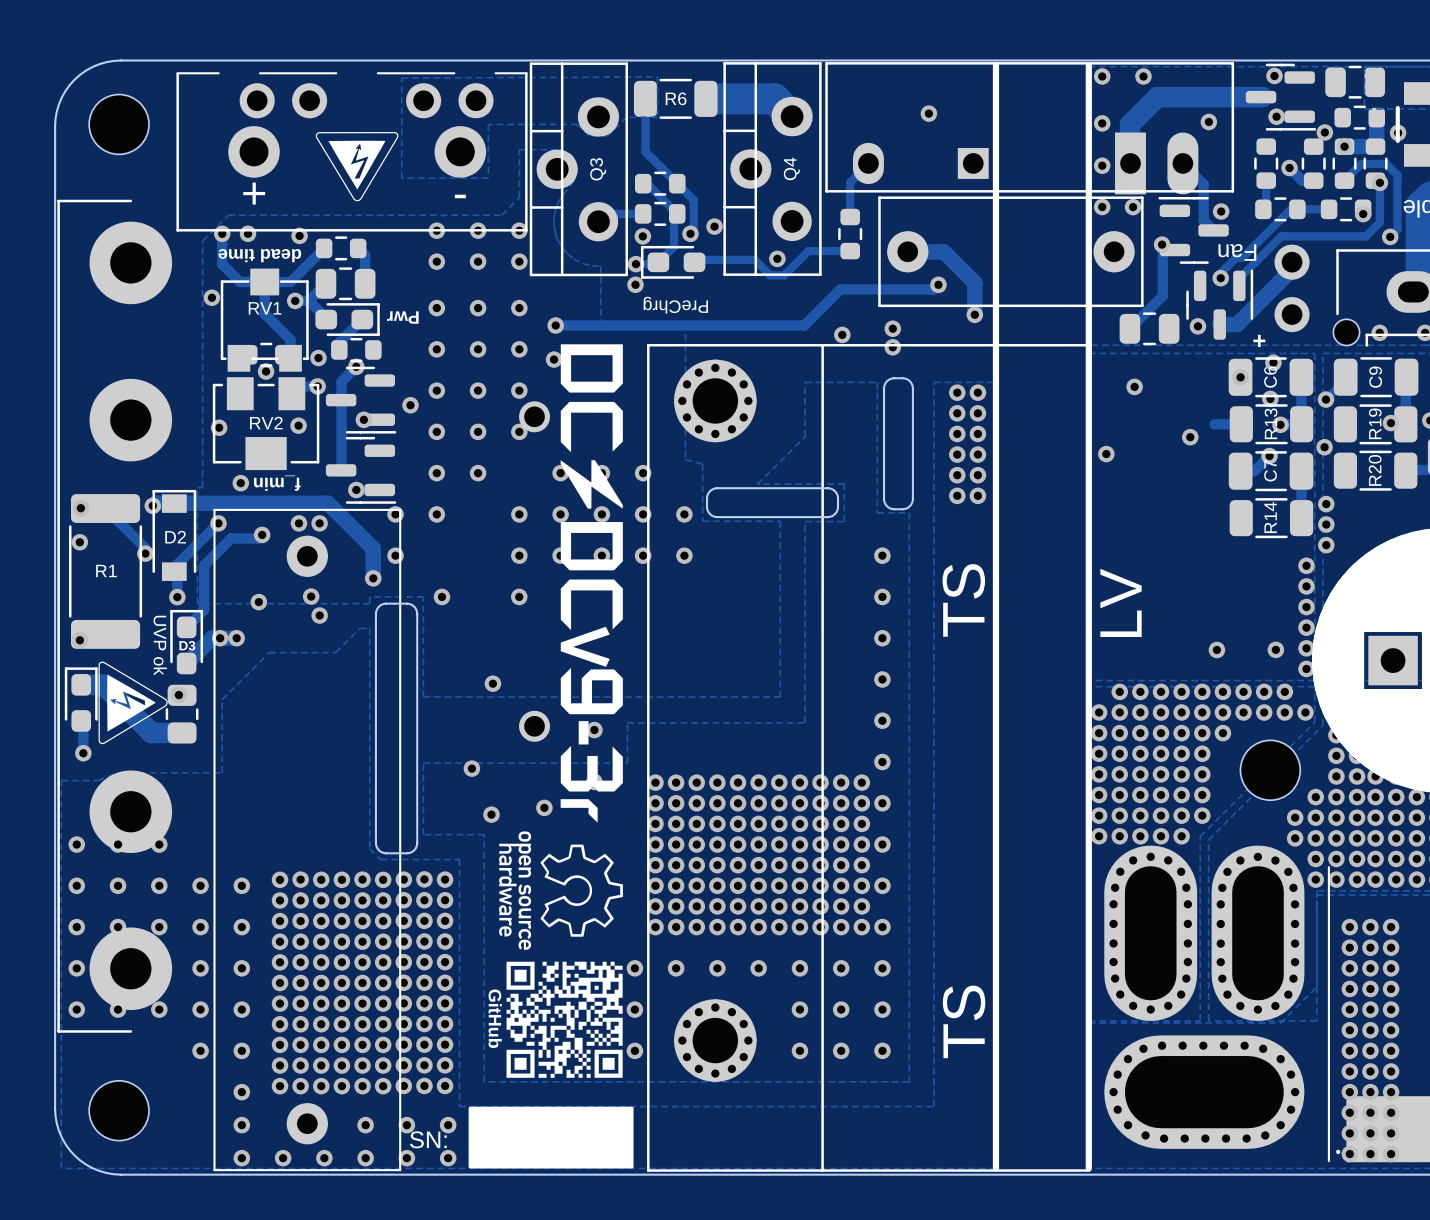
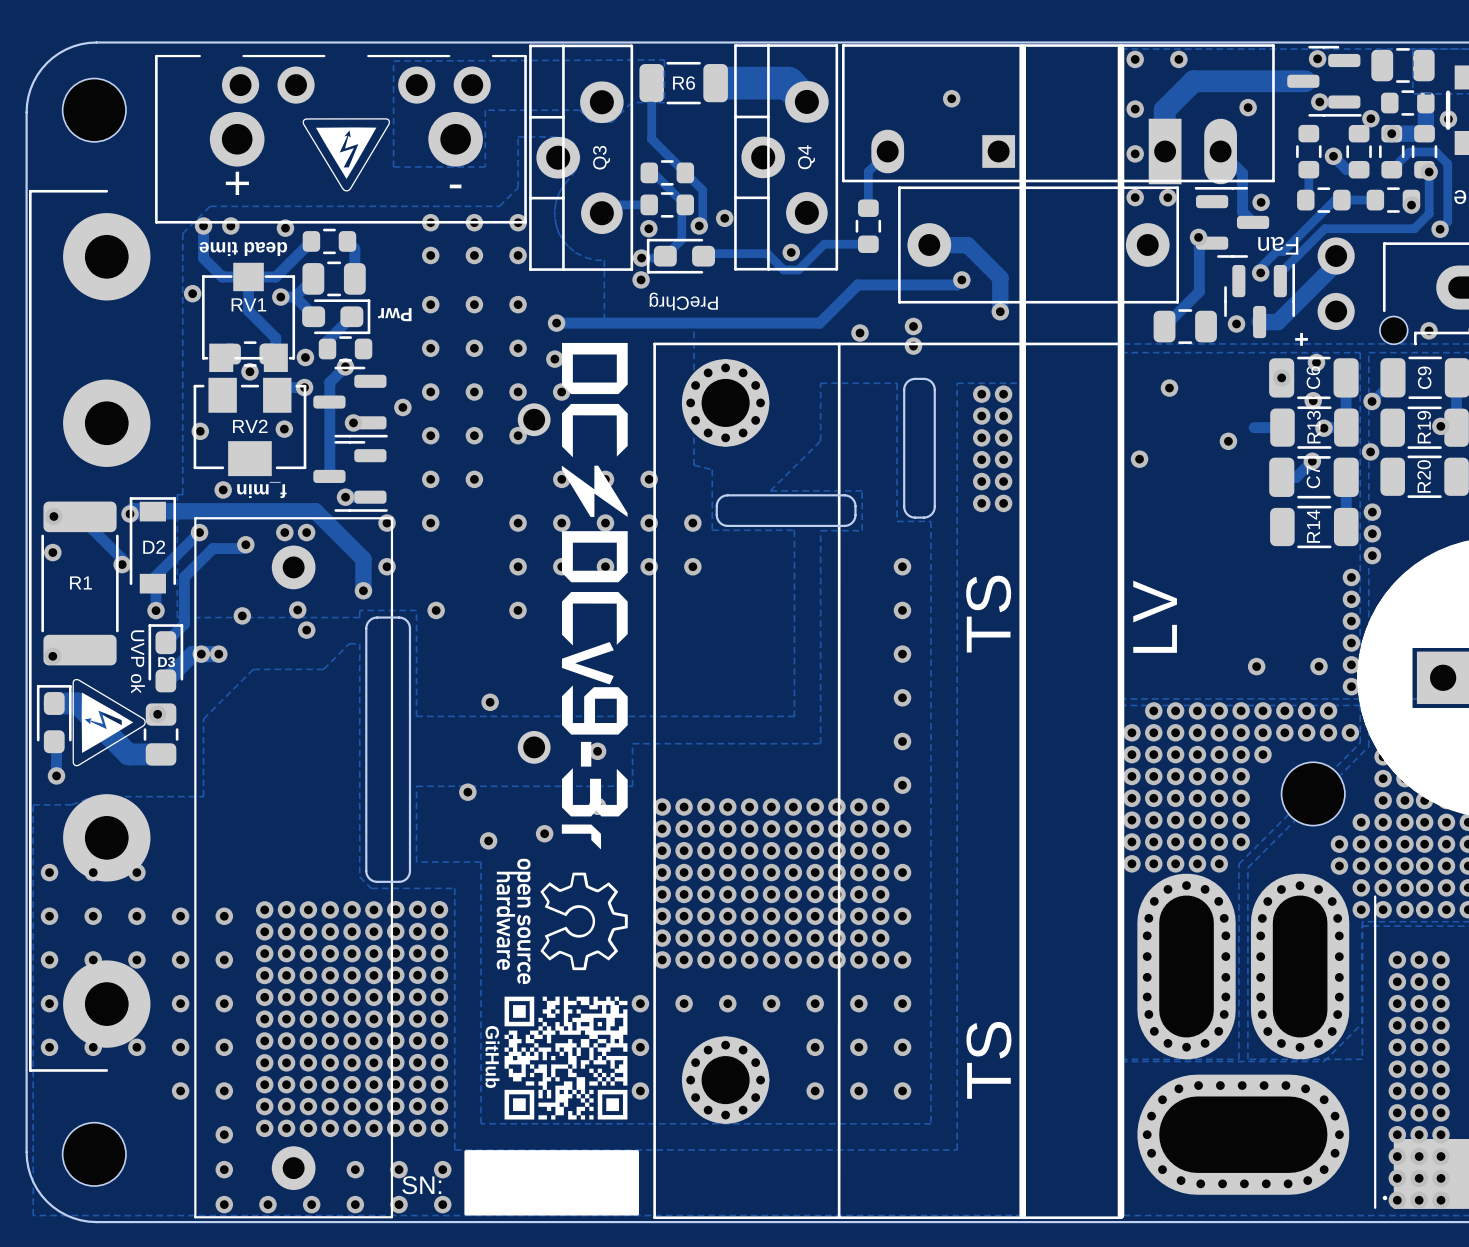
via: none -> (561, 392)

